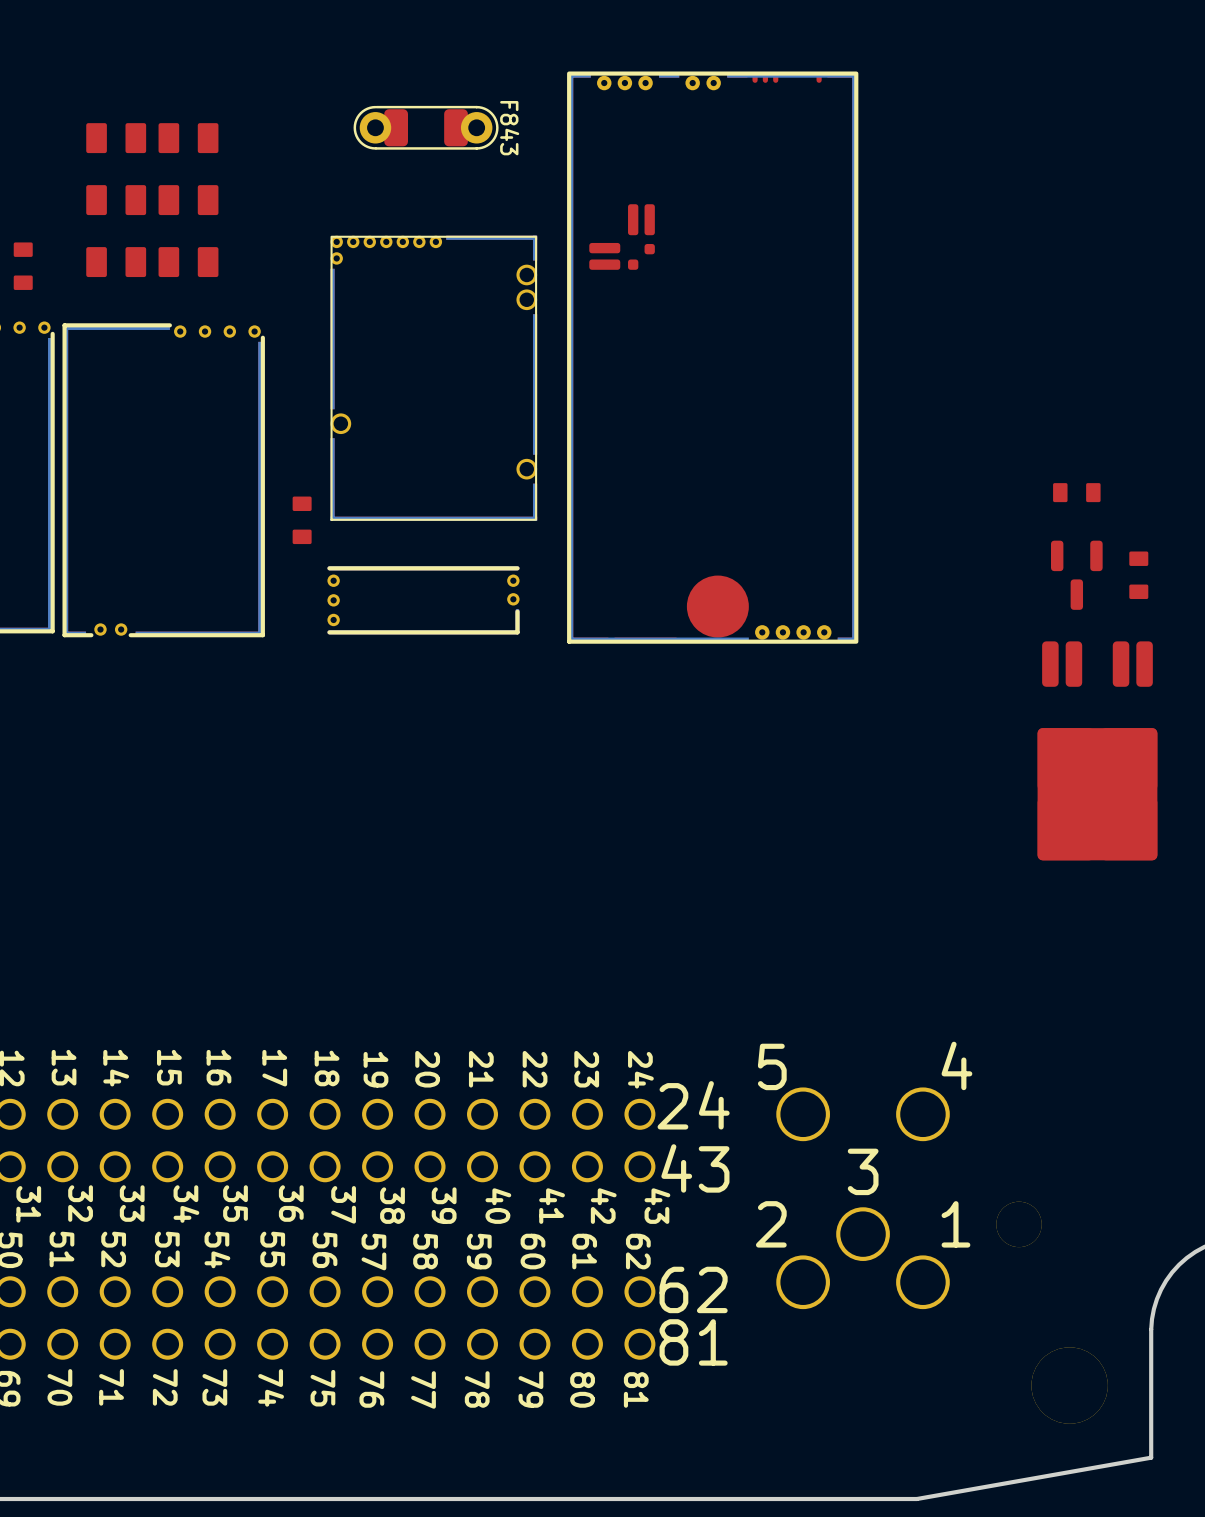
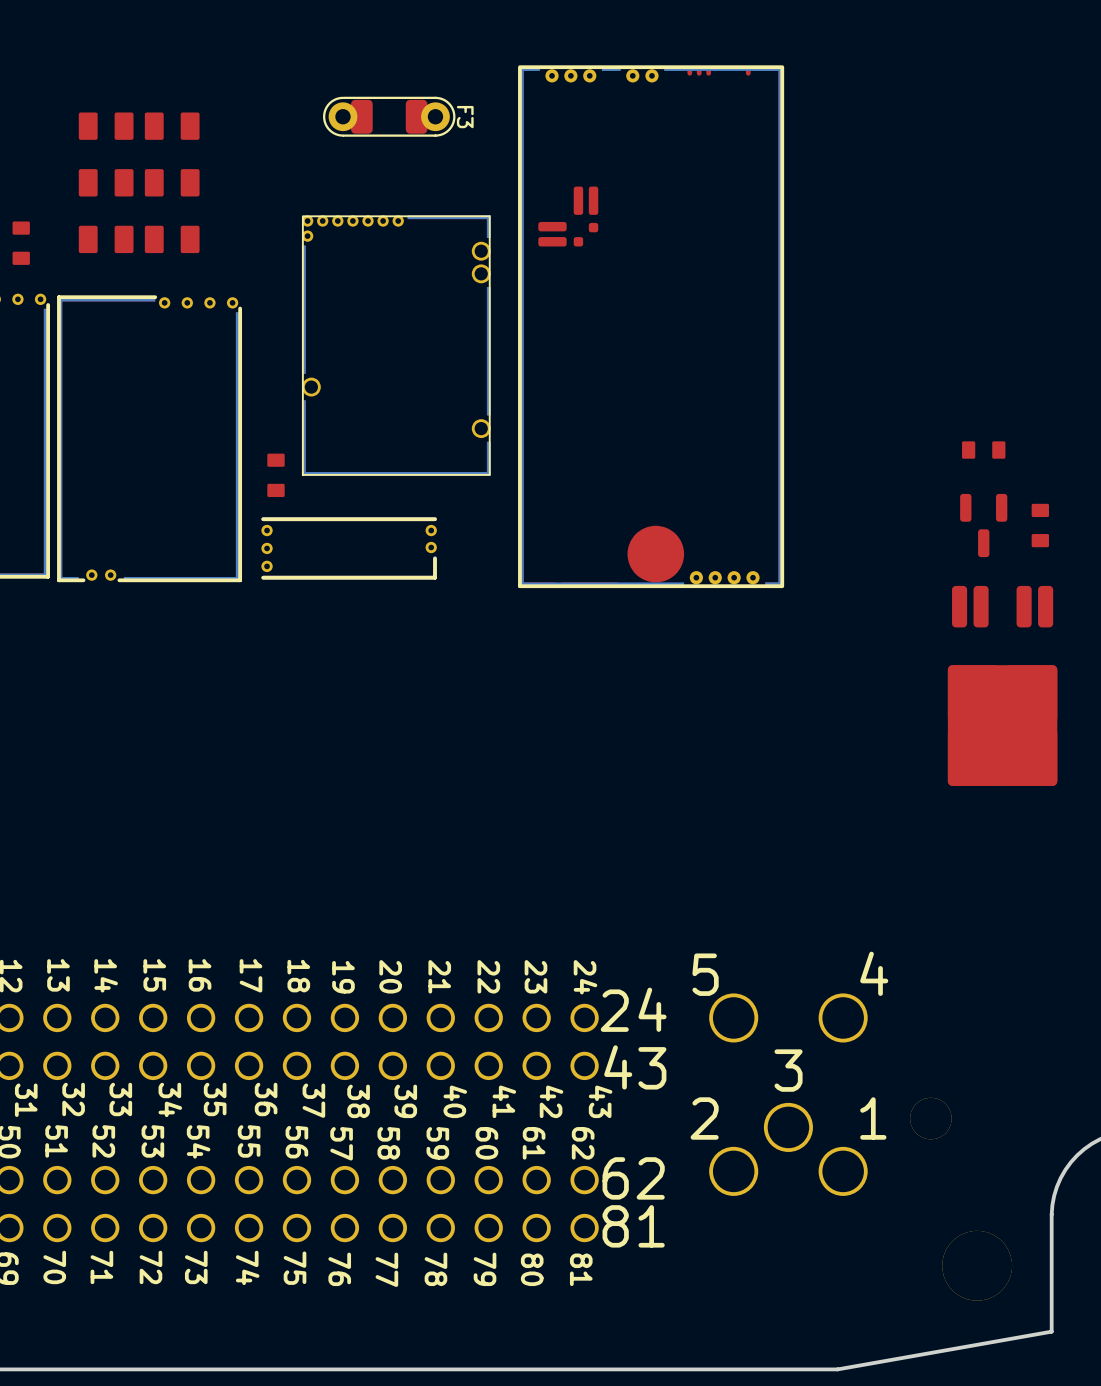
F843 name: F843 (509, 128) -> F3 (465, 117)
part position: (423, 600) -> (349, 548)

